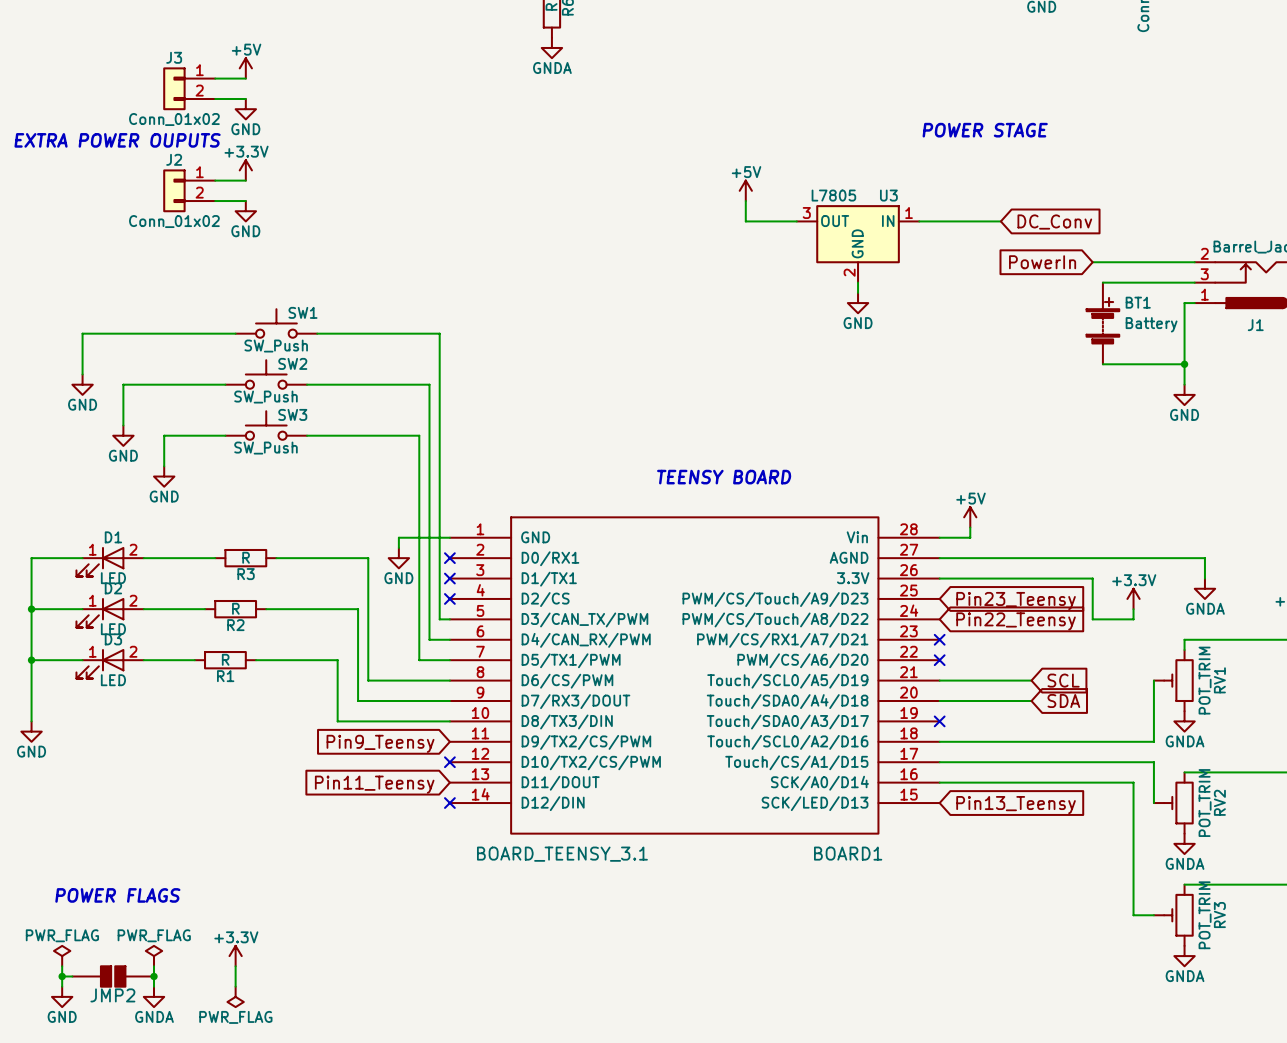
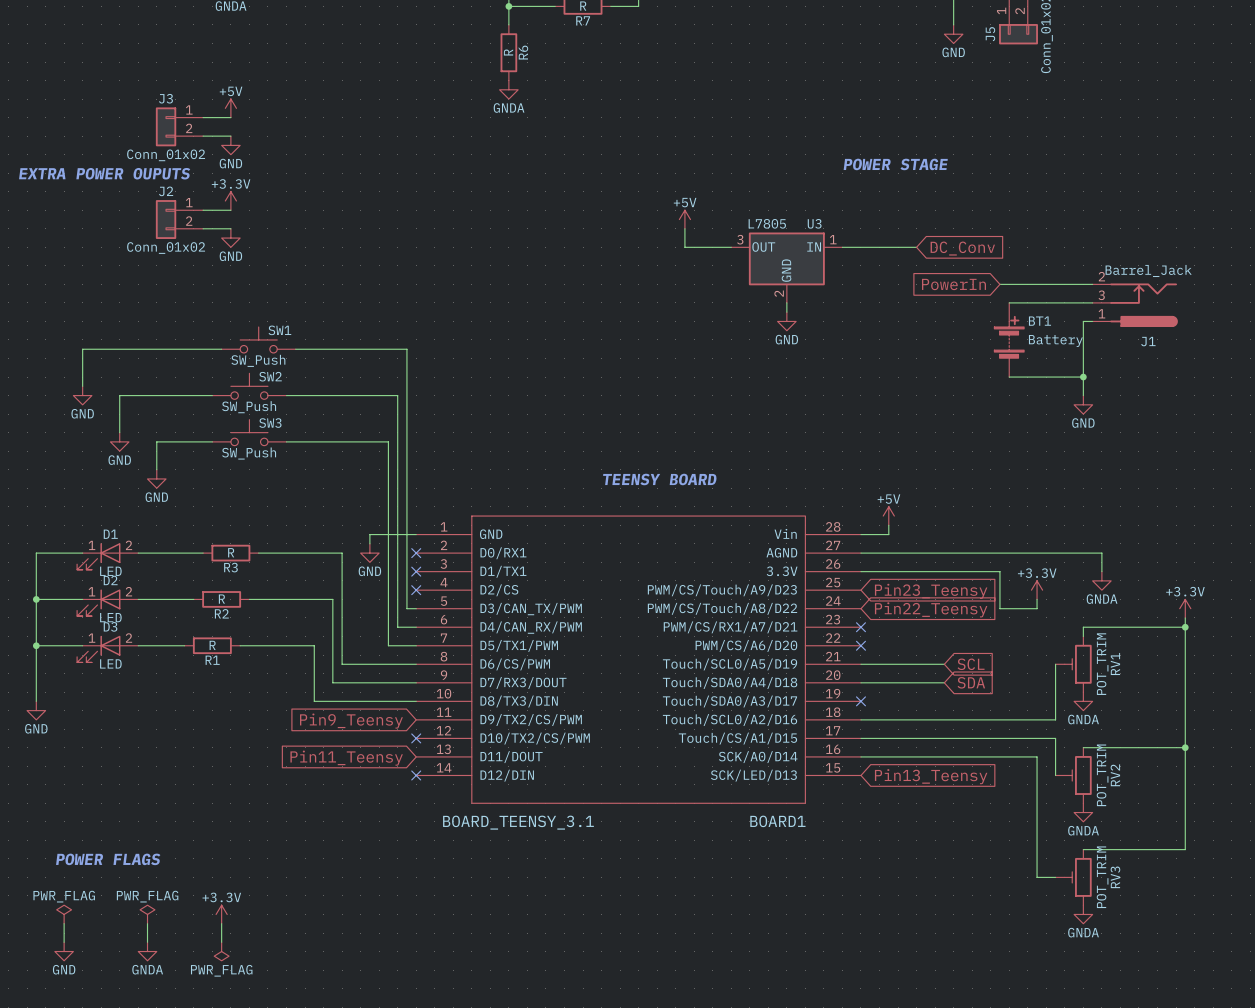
wire: (62, 976) (72, 976) -> none
junction: (62, 976) -> none
JMP2: (113, 976) -> none
junction: (154, 976) -> none

